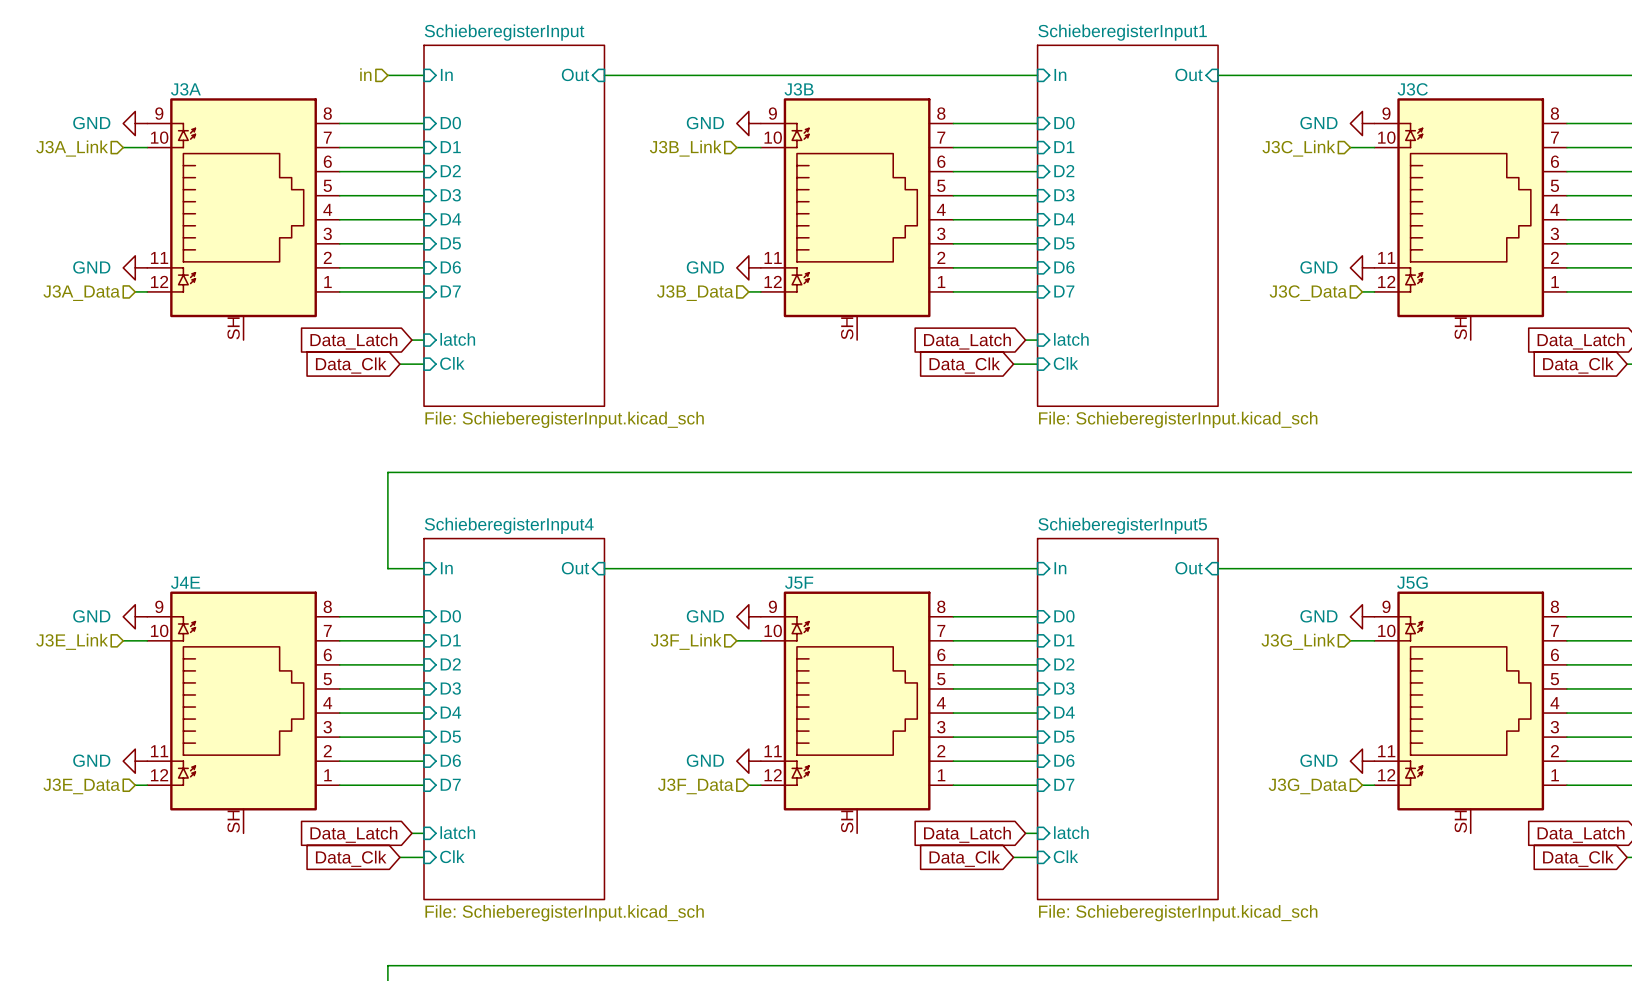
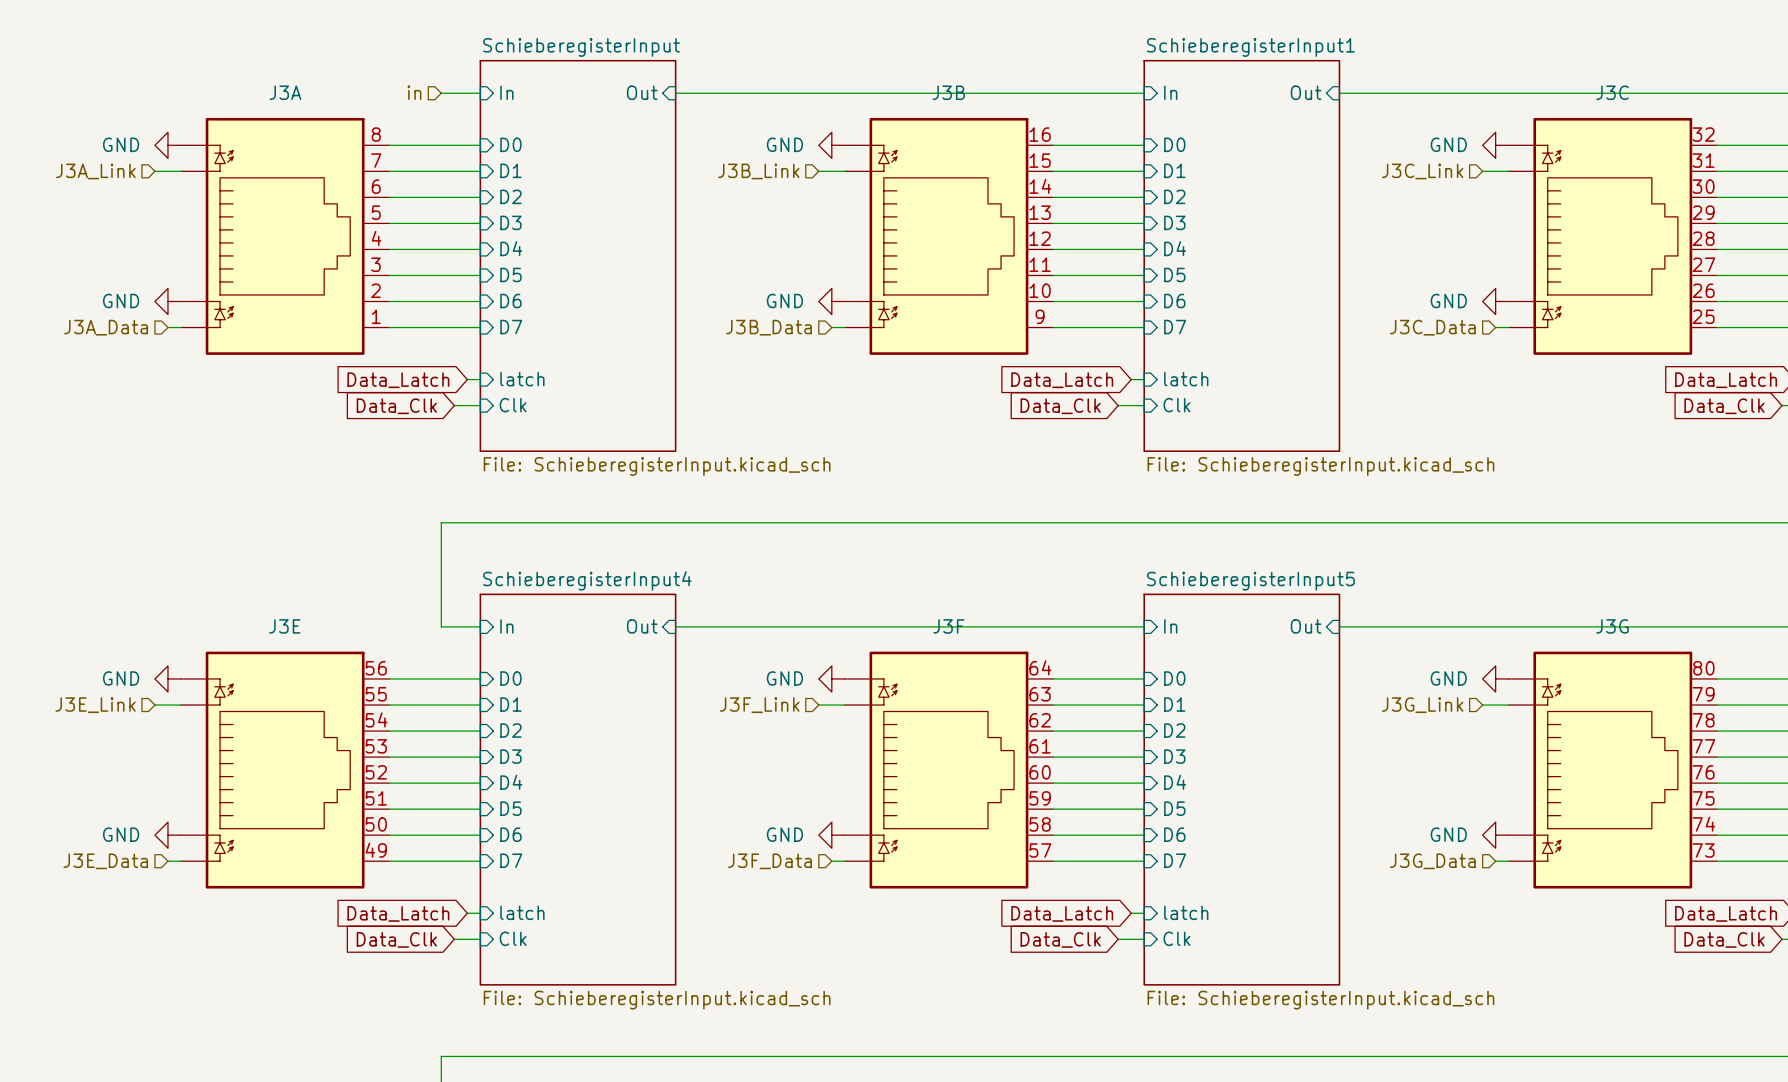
J3A name position: J3A (185, 89) -> J3A (285, 92)
J3B name position: J3B (799, 89) -> J3B (948, 92)
J3C name position: J3C (1412, 89) -> J3C (1612, 92)
J3A symbol: [147, 98, 340, 341] -> [180, 117, 390, 355]
J3B symbol: [760, 98, 954, 341] -> [844, 117, 1054, 355]
J3C symbol: [1374, 98, 1567, 341] -> [1508, 117, 1717, 355]
J3E: none -> (285, 770)
J3F: none -> (948, 770)
J3G: none -> (1612, 770)
J4E: (243, 712) -> none
J5F: (857, 712) -> none
J5G: (1470, 712) -> none

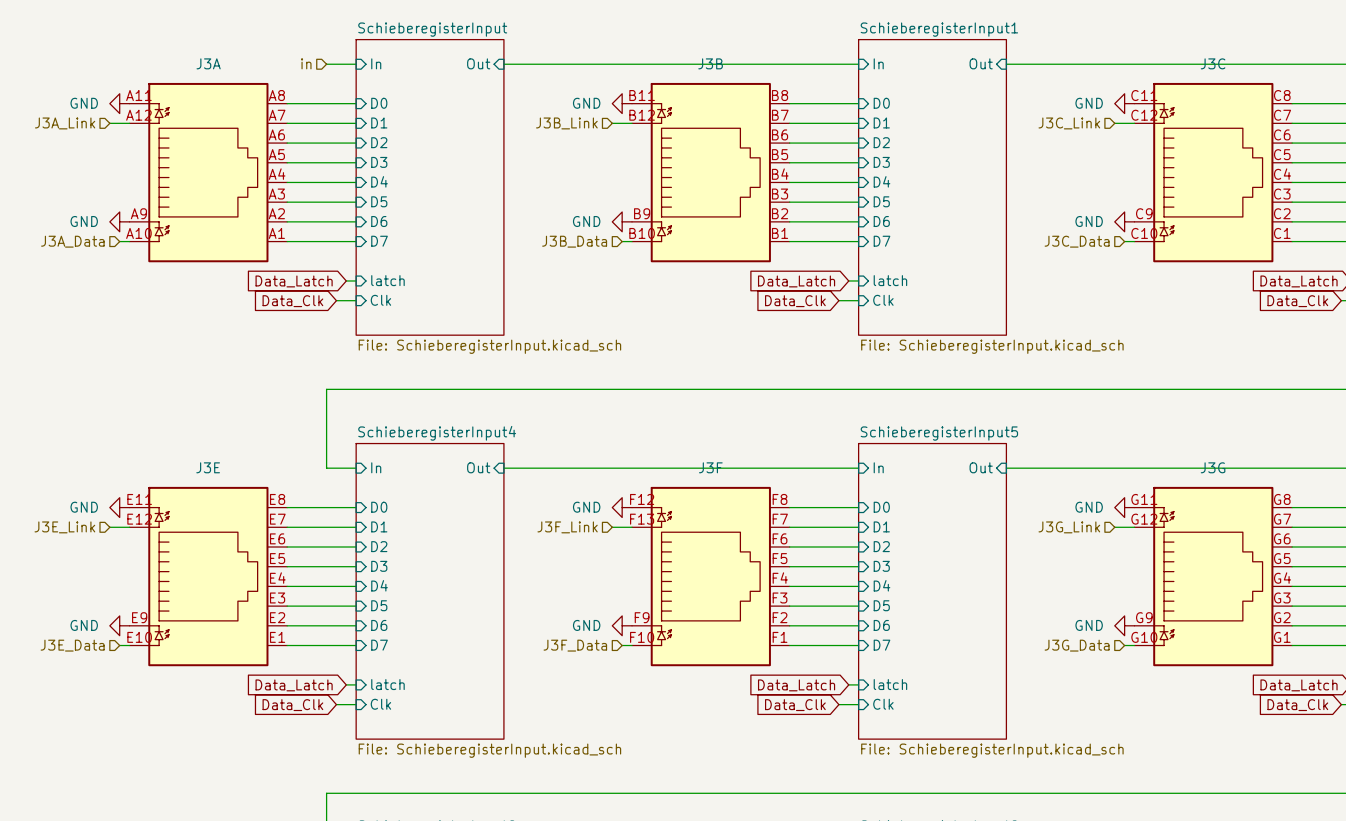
J3A symbol: [180, 117, 390, 355] -> [129, 82, 288, 263]
J3B symbol: [844, 117, 1054, 355] -> [632, 82, 790, 263]
J3C symbol: [1508, 117, 1717, 355] -> [1134, 82, 1293, 263]
J3E symbol: [180, 651, 390, 889] -> [129, 486, 288, 667]
J3F symbol: [844, 651, 1054, 889] -> [632, 486, 790, 667]
J3G symbol: [1508, 651, 1717, 889] -> [1134, 486, 1293, 667]

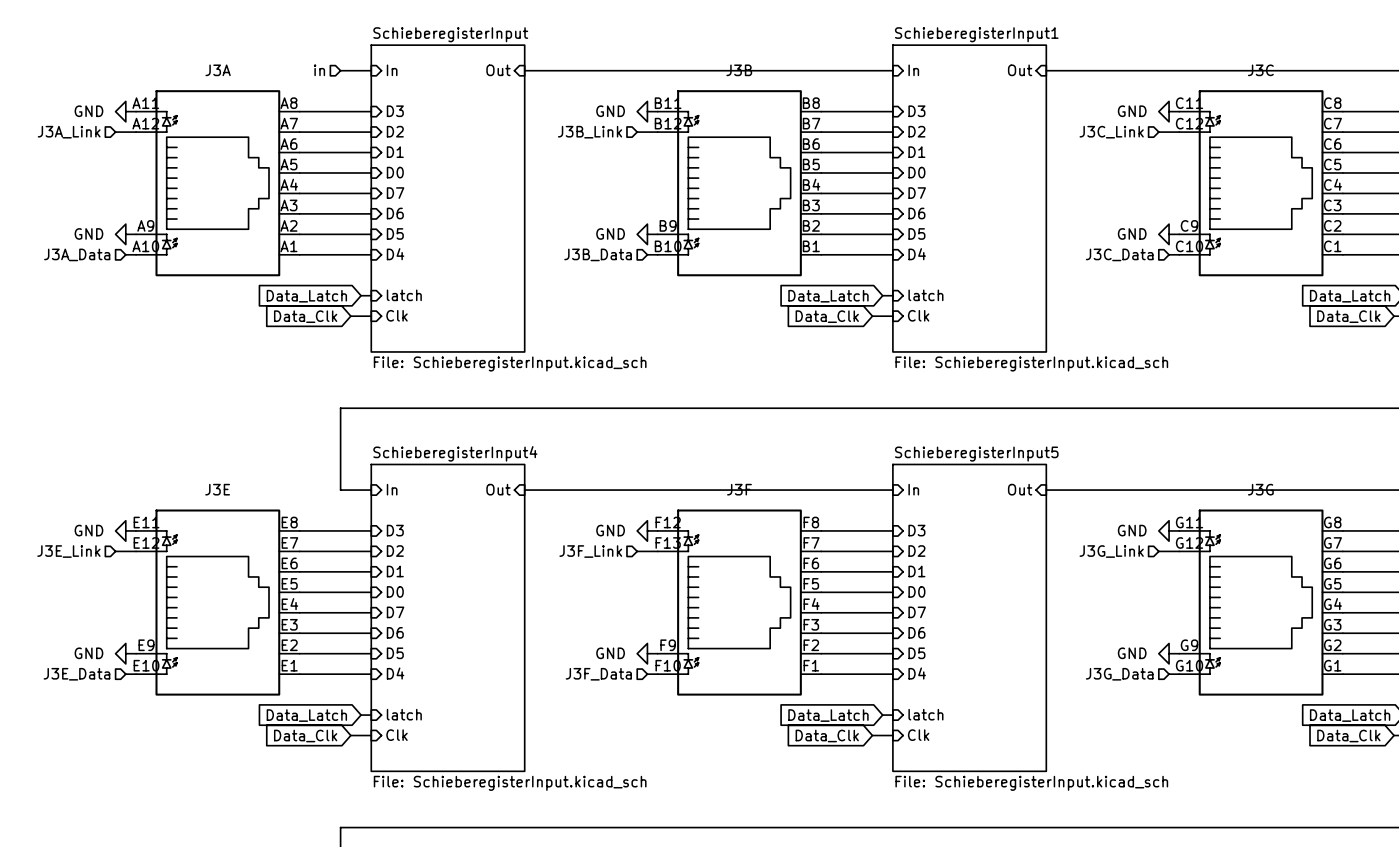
sheet pin: D0 (379, 103) -> D3 (395, 111)
sheet pin: D0 (881, 103) -> D3 (916, 111)
sheet pin: D1 (379, 122) -> D2 (395, 131)
sheet pin: D1 (881, 122) -> D2 (916, 131)
sheet pin: D2 (379, 142) -> D1 (395, 152)
sheet pin: D2 (881, 142) -> D1 (916, 152)
sheet pin: D3 (379, 162) -> D0 (395, 172)
sheet pin: D3 (881, 162) -> D0 (916, 172)
sheet pin: D4 (379, 181) -> D7 (395, 193)
sheet pin: D4 (881, 181) -> D7 (917, 193)
sheet pin: D5 (379, 201) -> D6 (395, 213)
sheet pin: D5 (881, 201) -> D6 (916, 213)
sheet pin: D6 (379, 221) -> D5 (395, 233)
sheet pin: D6 (881, 221) -> D5 (916, 233)
sheet pin: D7 (379, 241) -> D4 (395, 254)
sheet pin: D7 (881, 241) -> D4 (917, 254)
sheet pin: D0 (379, 507) -> D3 (395, 530)
sheet pin: D0 (881, 507) -> D3 (916, 530)
sheet pin: D1 (379, 526) -> D2 (395, 551)
sheet pin: D1 (881, 526) -> D2 (916, 551)
sheet pin: D2 (379, 546) -> D1 (395, 571)
sheet pin: D2 (881, 546) -> D1 (916, 571)
sheet pin: D3 (379, 566) -> D0 (395, 591)
sheet pin: D3 (881, 566) -> D0 (916, 591)
sheet pin: D4 (379, 585) -> D7 (395, 612)
sheet pin: D4 (881, 585) -> D7 (917, 612)
sheet pin: D5 (379, 605) -> D6 (395, 632)
sheet pin: D5 (881, 605) -> D6 (916, 632)
sheet pin: D6 (379, 625) -> D5 (395, 653)
sheet pin: D6 (881, 625) -> D5 (916, 653)
sheet pin: D7 (379, 645) -> D4 (395, 673)
sheet pin: D7 (881, 645) -> D4 (917, 673)

